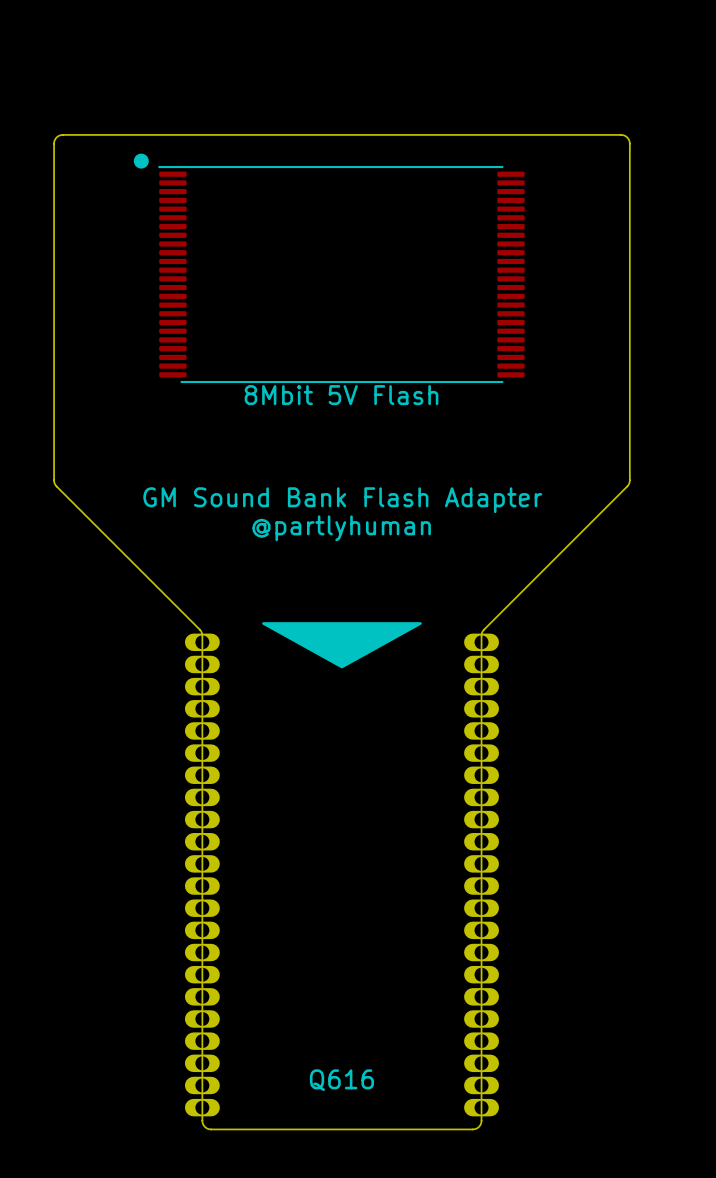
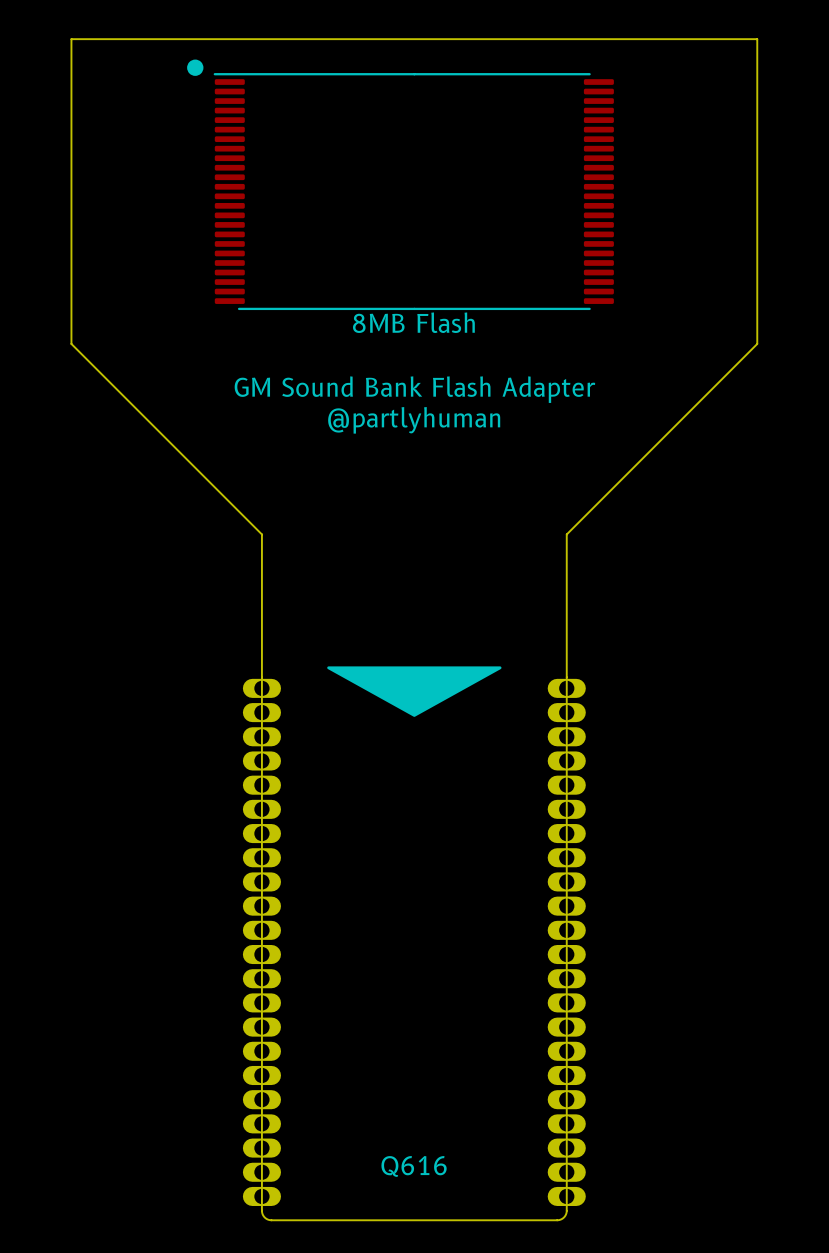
drawing position: (141, 161) -> (195, 67)
part: none -> 8MB Flash (413, 191)
part: 8Mbit 5V Flash (341, 274) -> none
text position: GM Sound Bank Flash Adapter (342, 500) -> GM Sound Bank Flash Adapter (414, 389)
text position: @partlyhuman (341, 528) -> @partlyhuman (414, 420)
board edge: (202, 635) (199, 629) (54, 482) (54, 143) (55, 138) (62, 134) (623, 135) (628, 138) (629, 143) (629, 482) (484, 629) (481, 635) -> (261, 681) (261, 534) (71, 343) (71, 39) (757, 39) (757, 343) (566, 534) (566, 681)

